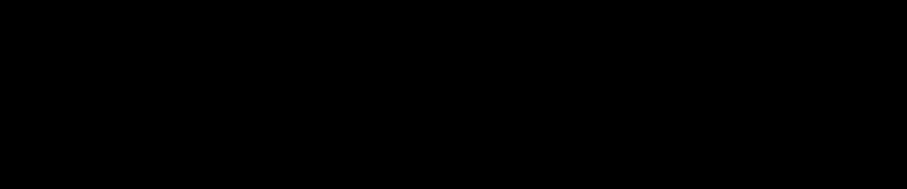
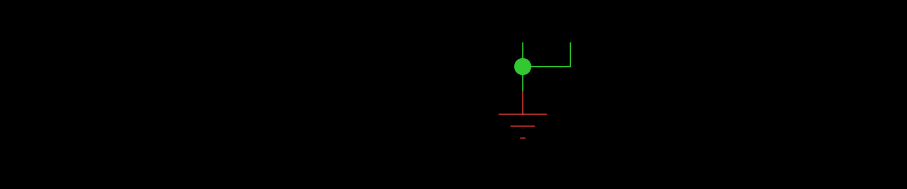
wire: none -> (522, 42) (522, 90)
wire: none -> (570, 42) (570, 66) (522, 66)
junction: none -> (522, 66)
power symbol: none -> (522, 114)

